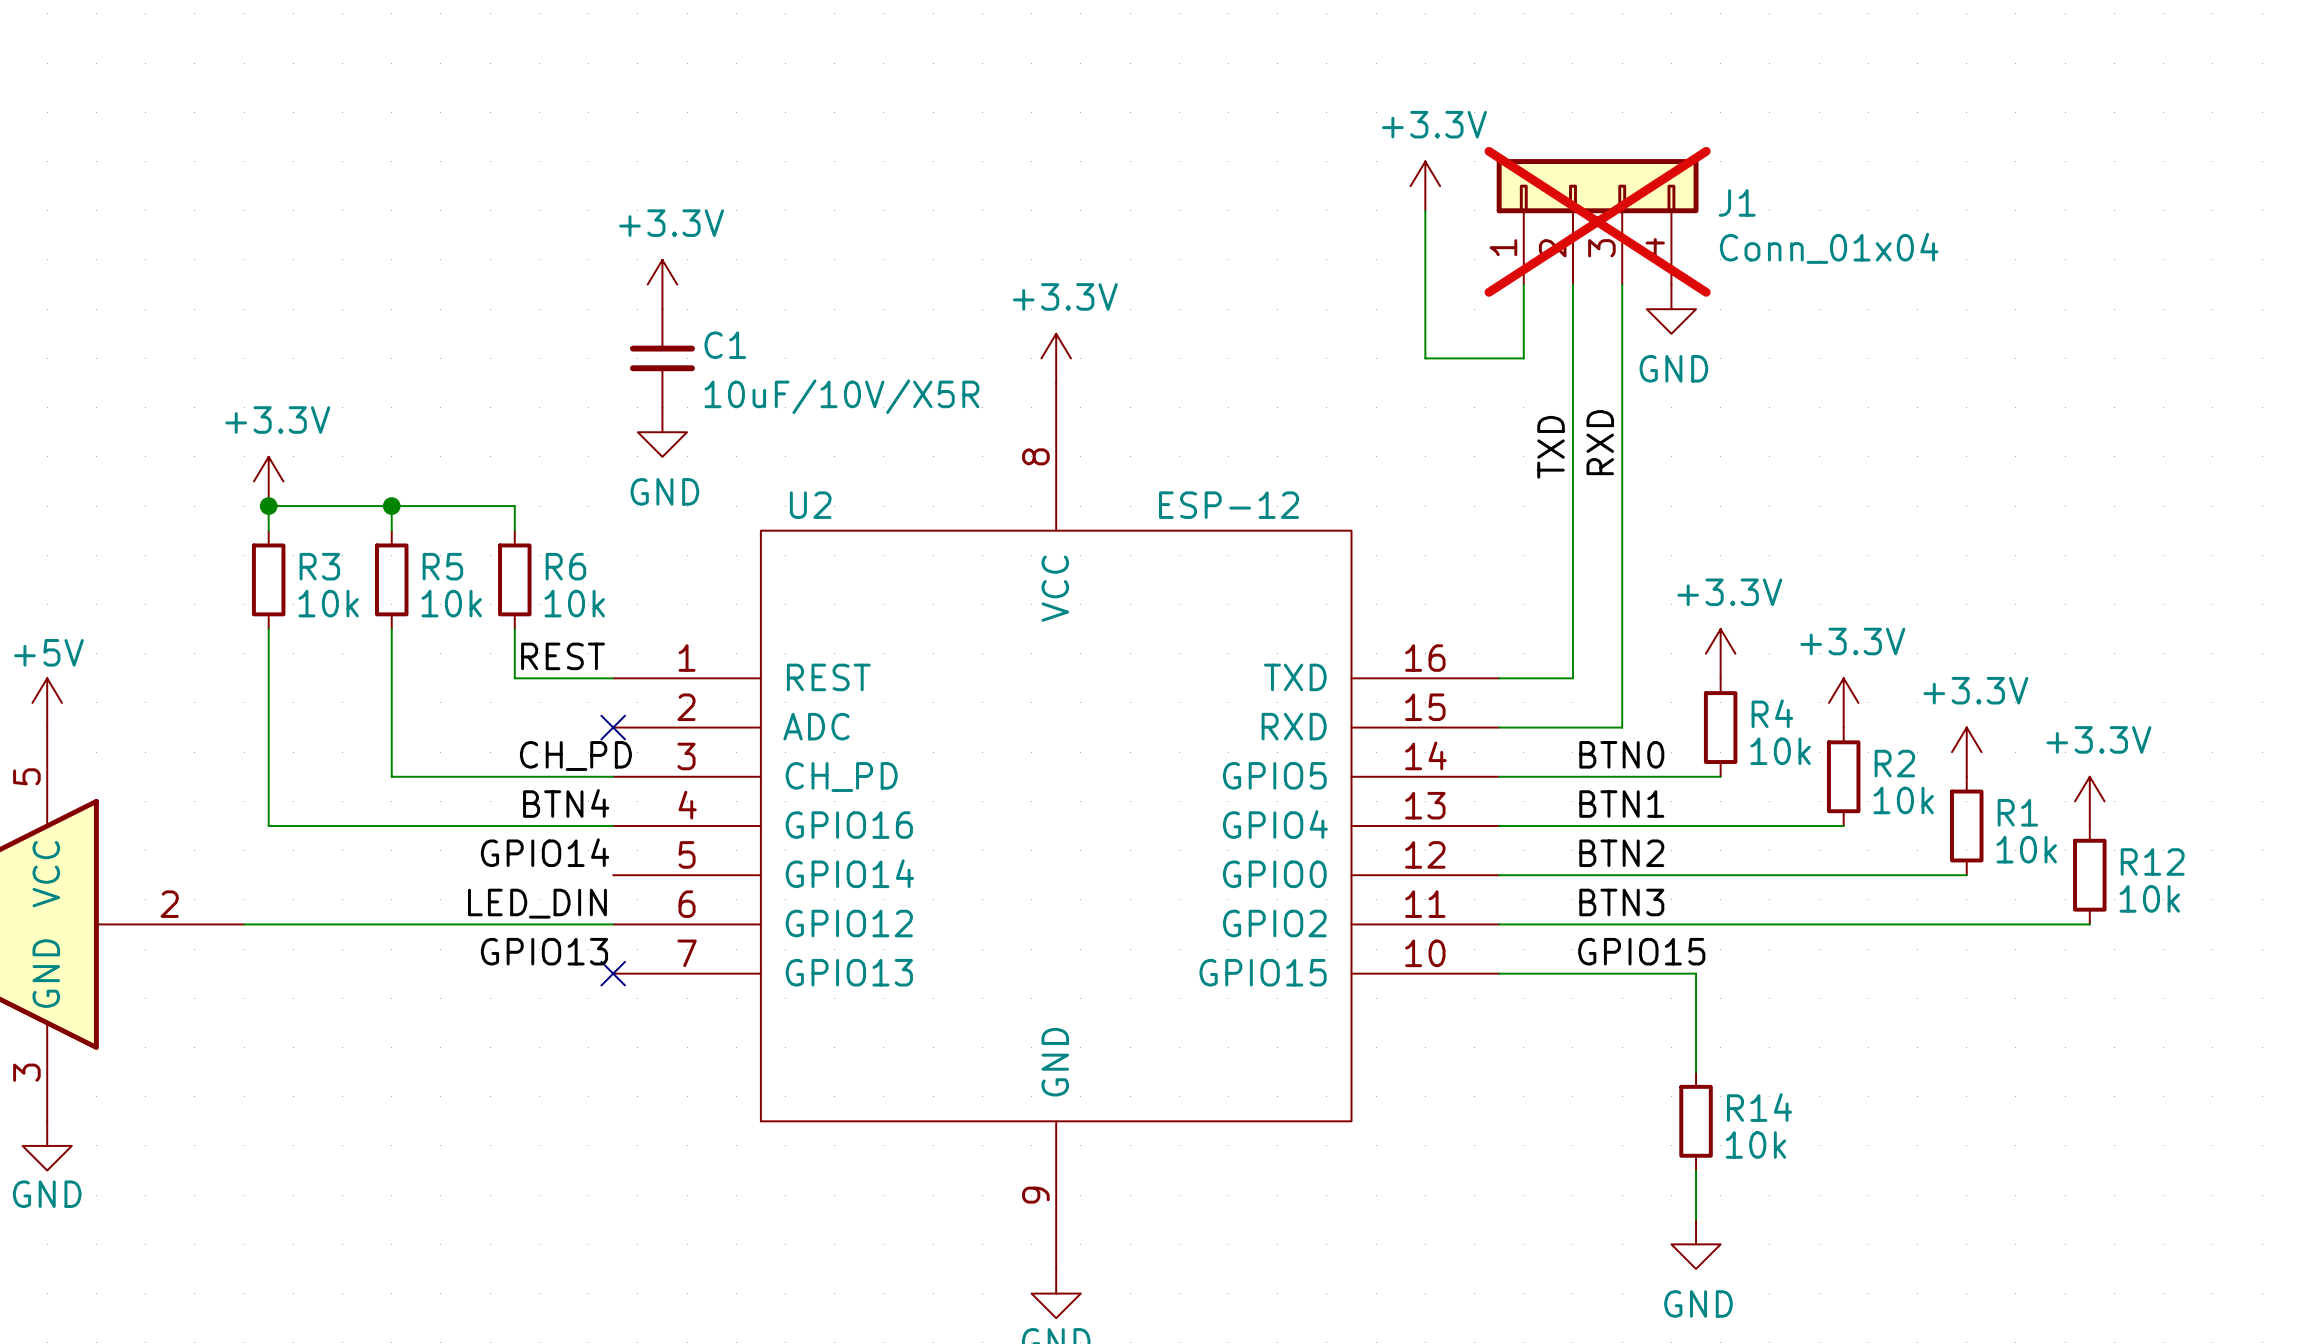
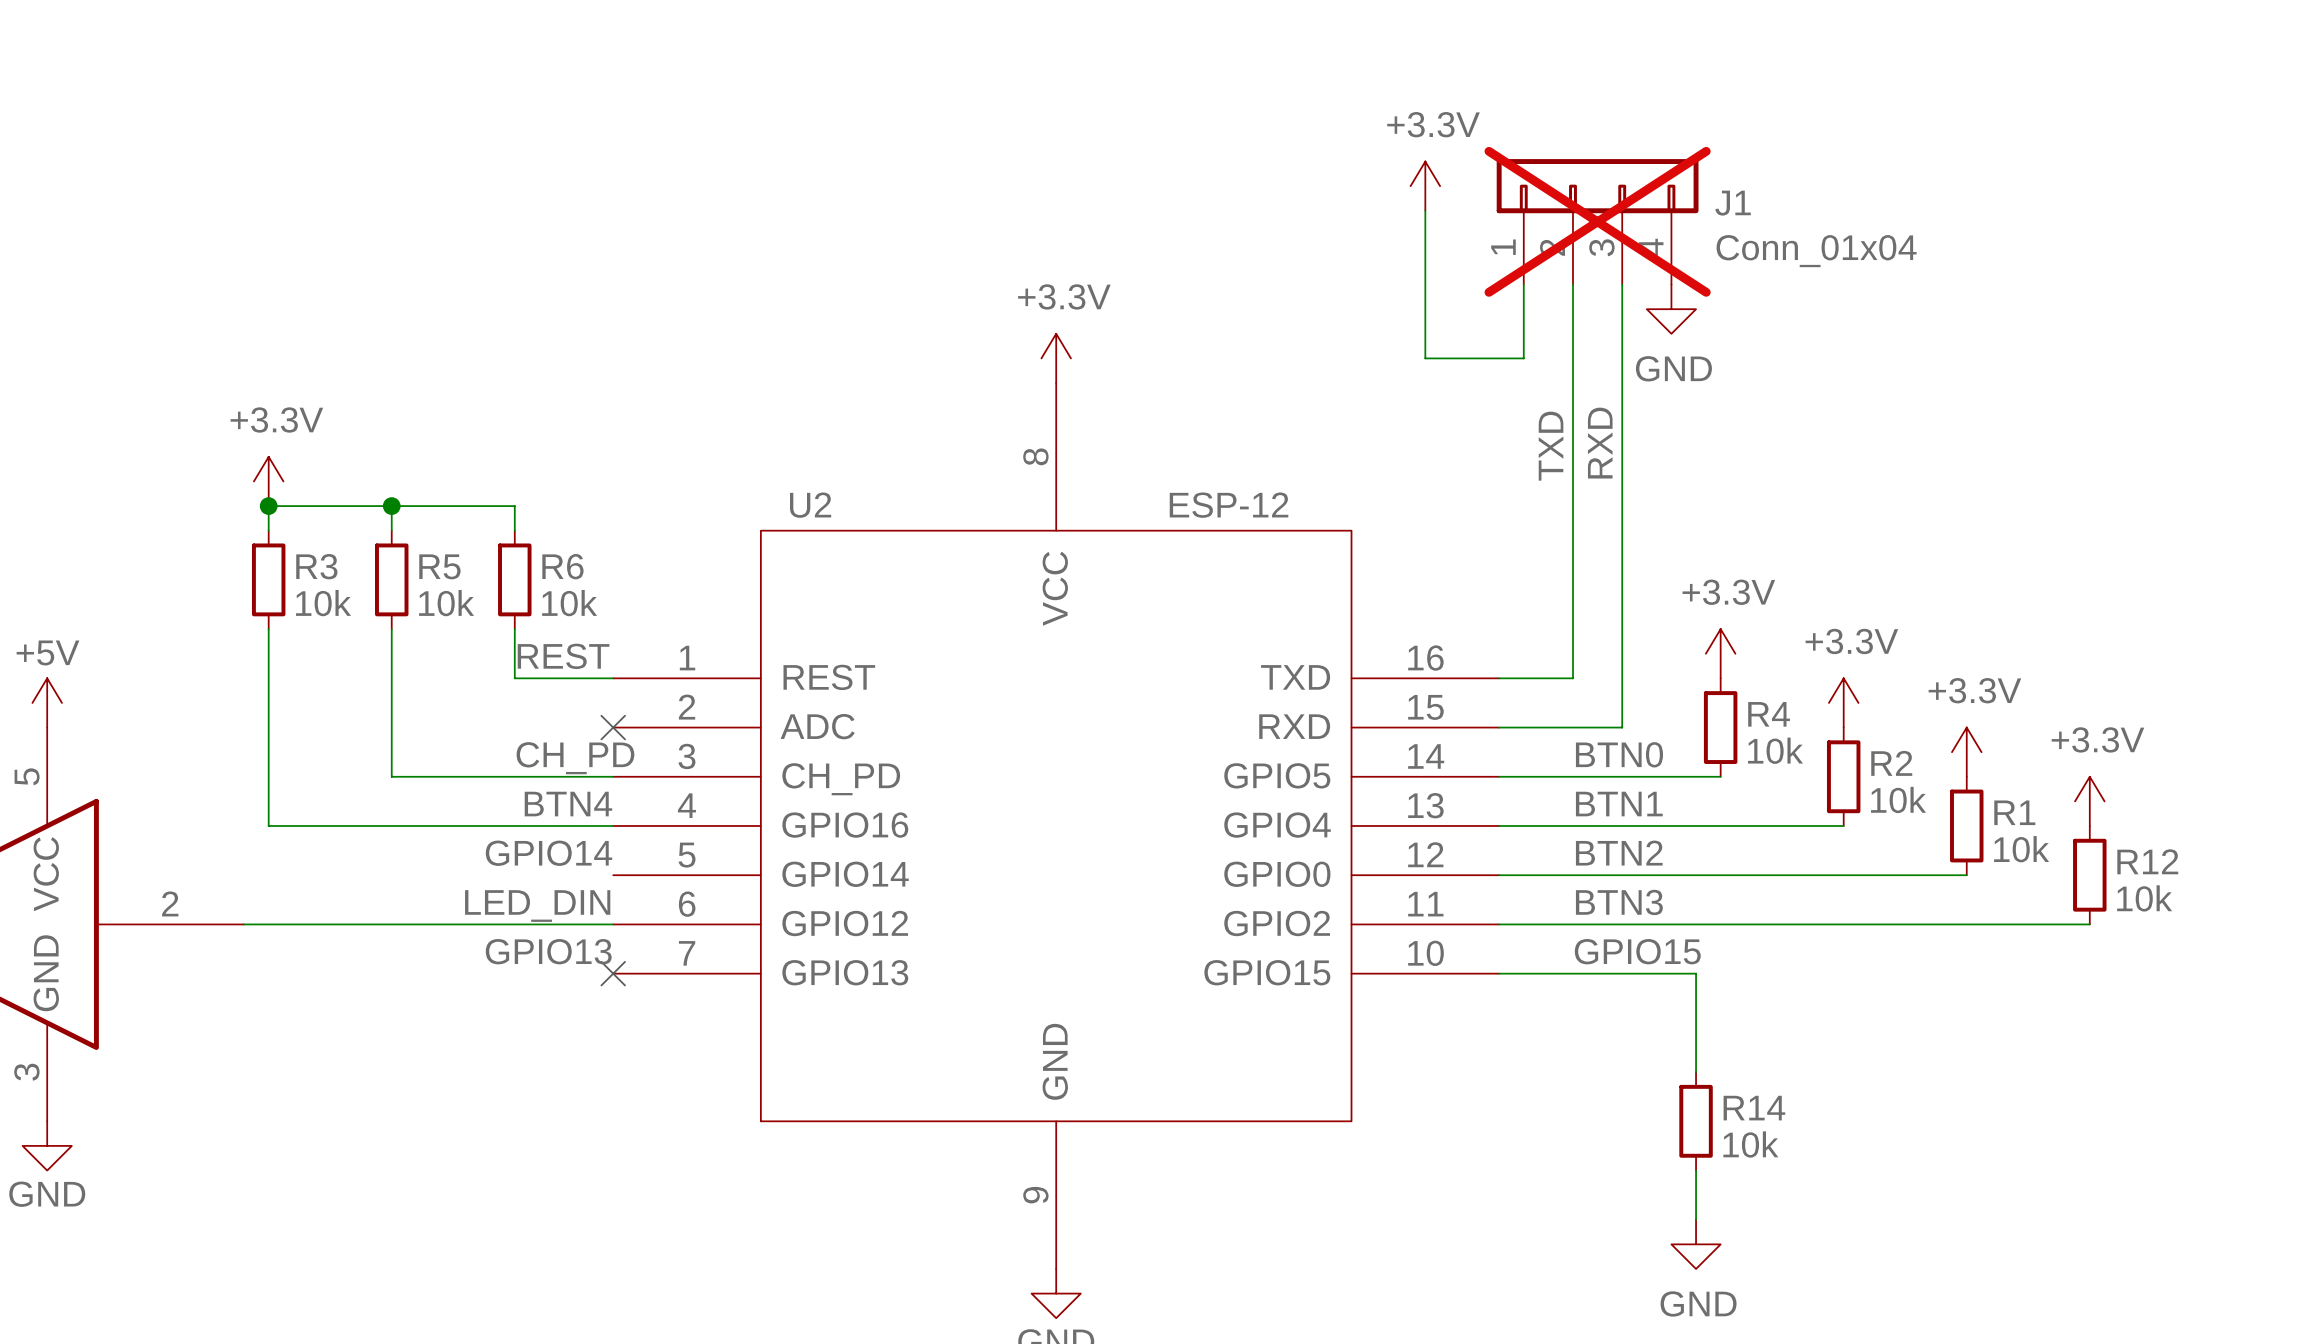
power symbol: +3.3V (662, 284) -> none
C1: 10uF/10V/X5R (662, 358) -> none
power symbol: GND (662, 432) -> none

